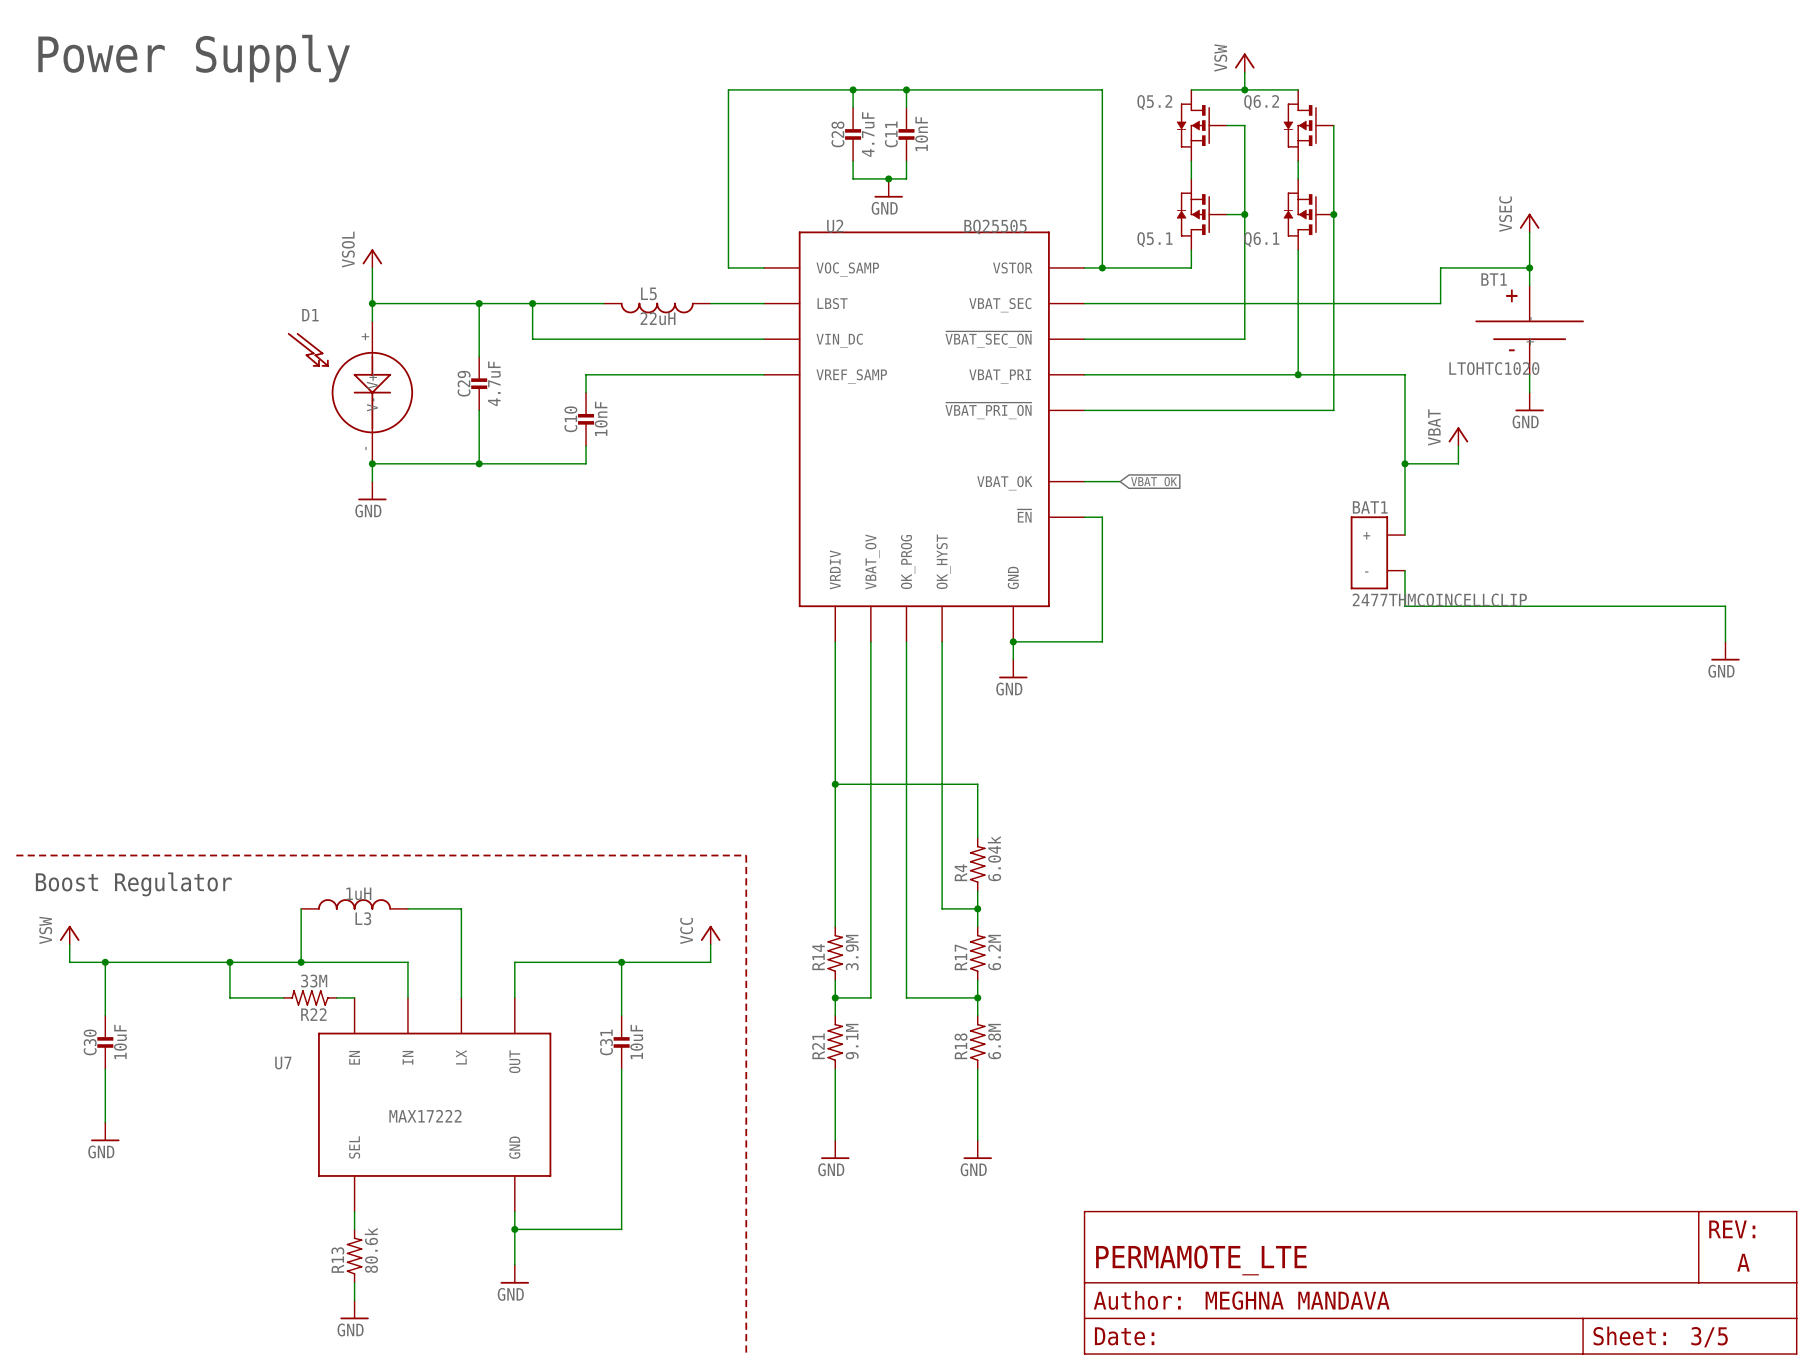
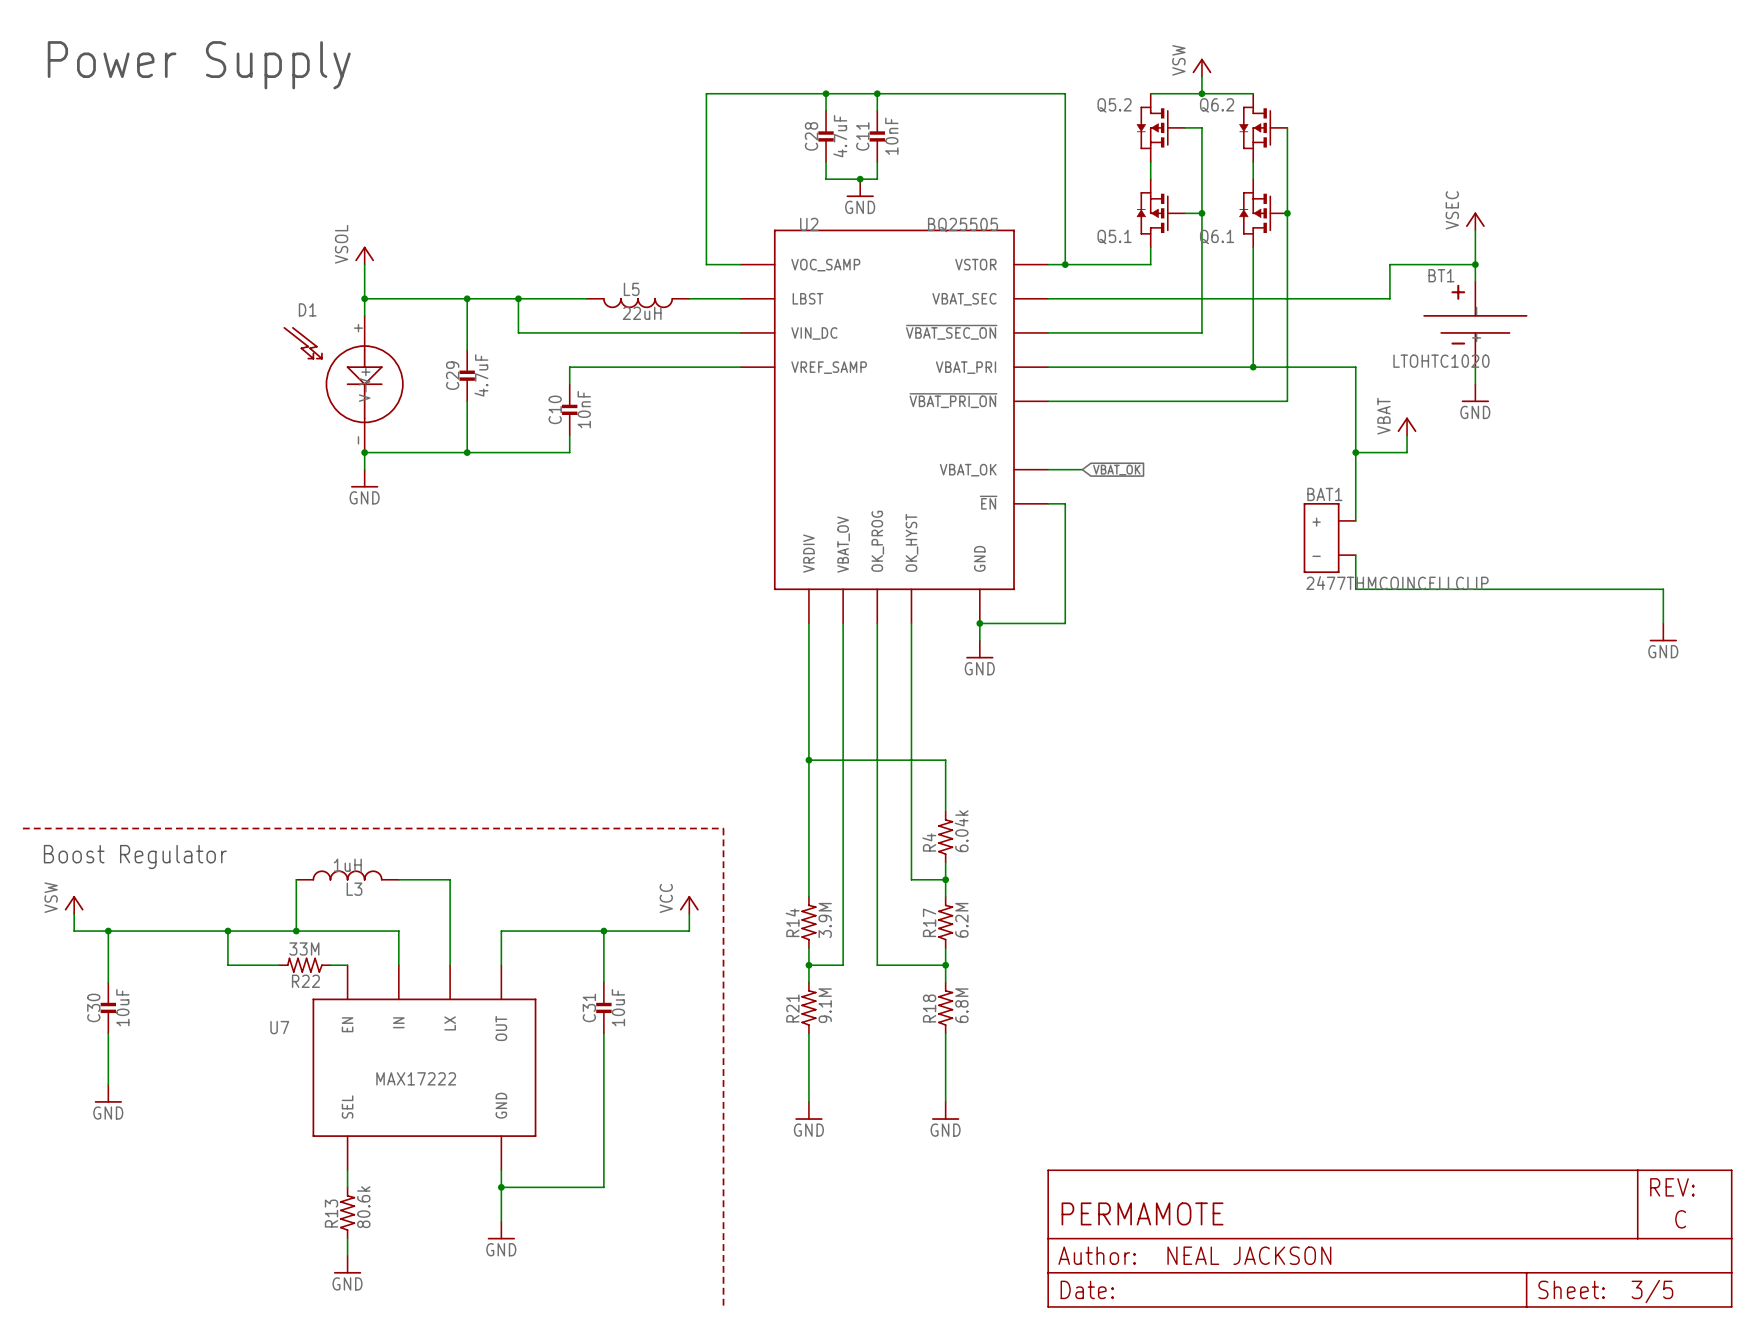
part text: PERMAMOTE_LTE (1201, 1260) -> PERMAMOTE (1142, 1213)
part text: A (1743, 1262) -> C (1680, 1219)
part text: MEGHNA MANDAVA (1297, 1300) -> NEAL JACKSON (1249, 1255)

